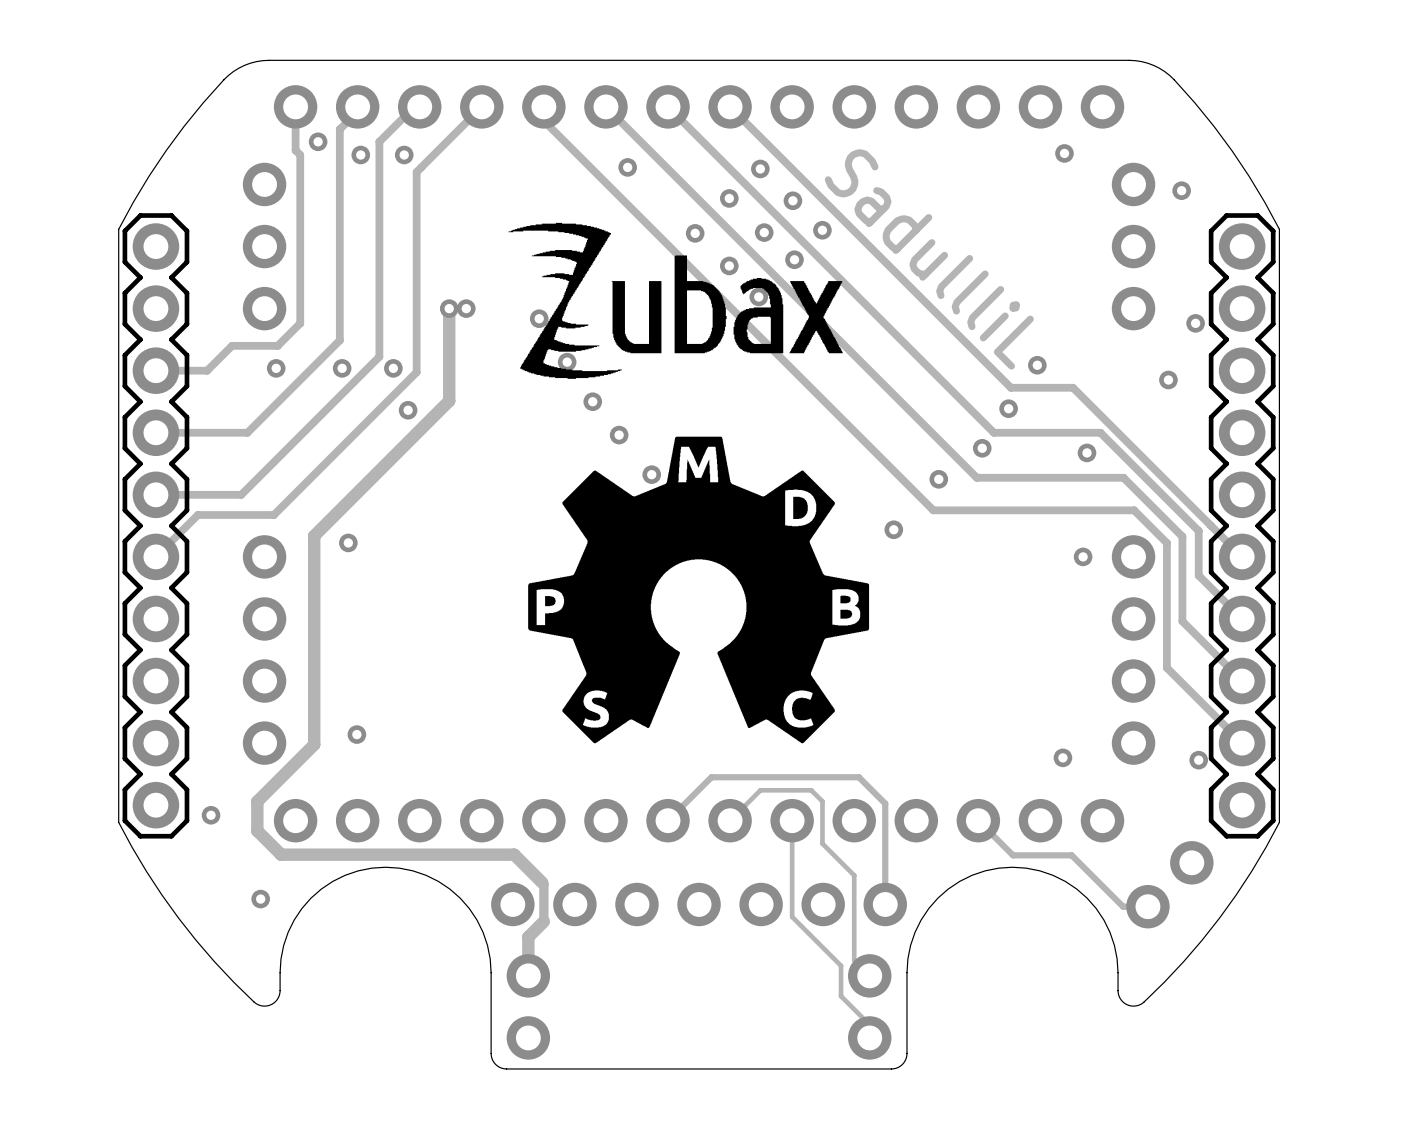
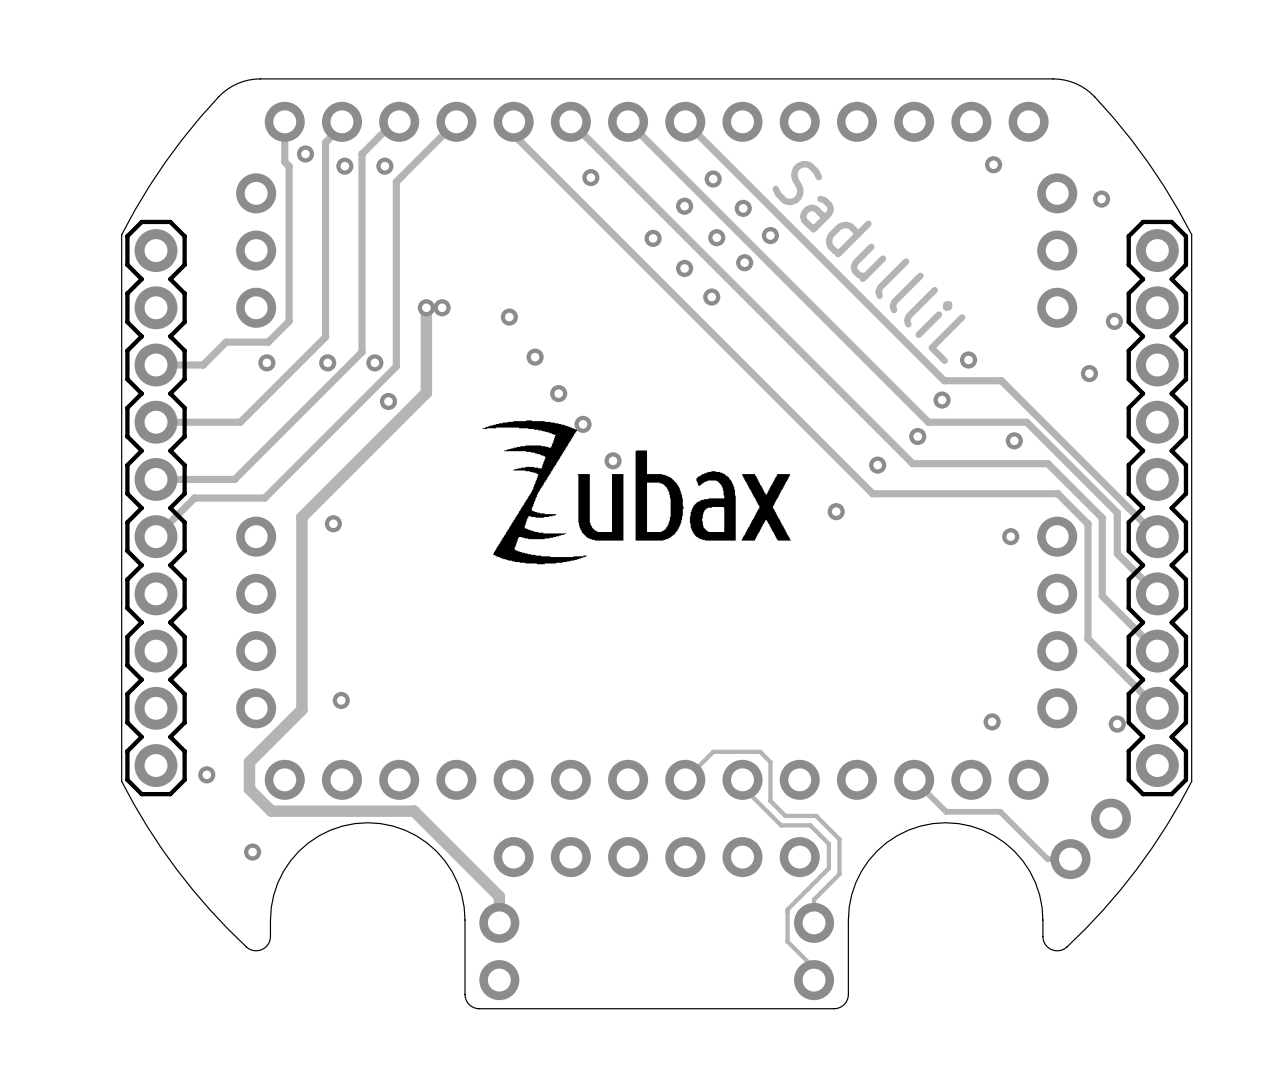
drawing position: (675, 300) -> (636, 492)
drawing: [528, 436, 870, 744] -> none
track: (668, 820) (711, 777) (858, 777) (885, 803) (885, 904) -> none
track: (792, 828) (792, 916) (841, 965) -> (742, 786) (781, 825) (810, 825) (828, 843) (828, 868) (787, 909) (787, 913)
track: (435, 854) (514, 854) (542, 882) (543, 921) (528, 937) (528, 947) -> (414, 811) (499, 896)
track: (838, 859) (854, 875) (854, 960) (869, 975) -> (785, 815) (816, 815) (839, 839) (839, 874) (814, 899) (814, 922)
part footprint: [491, 882, 907, 927] -> [493, 837, 820, 878]

